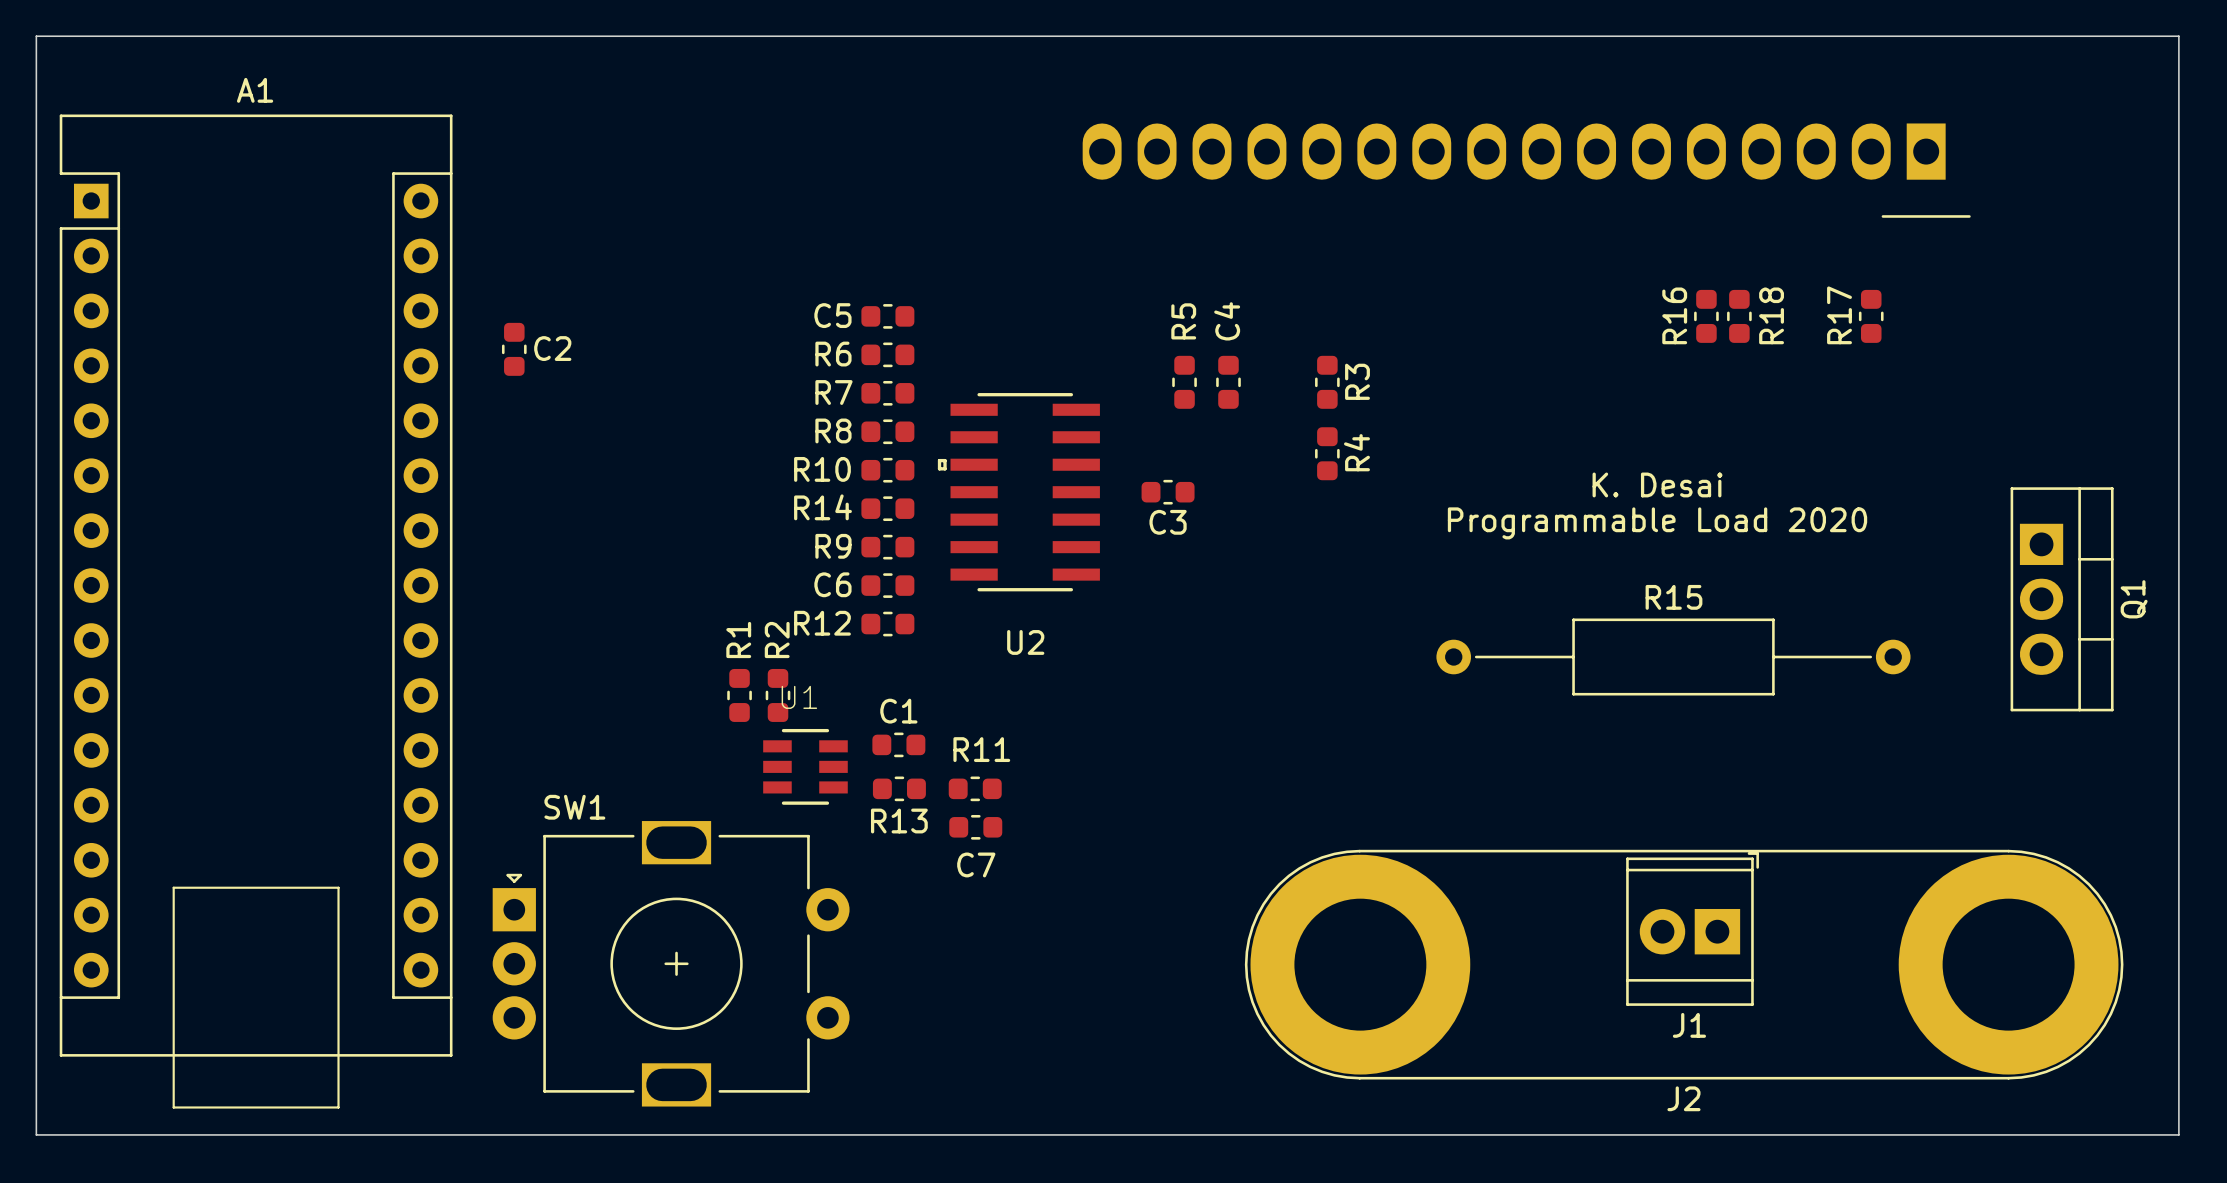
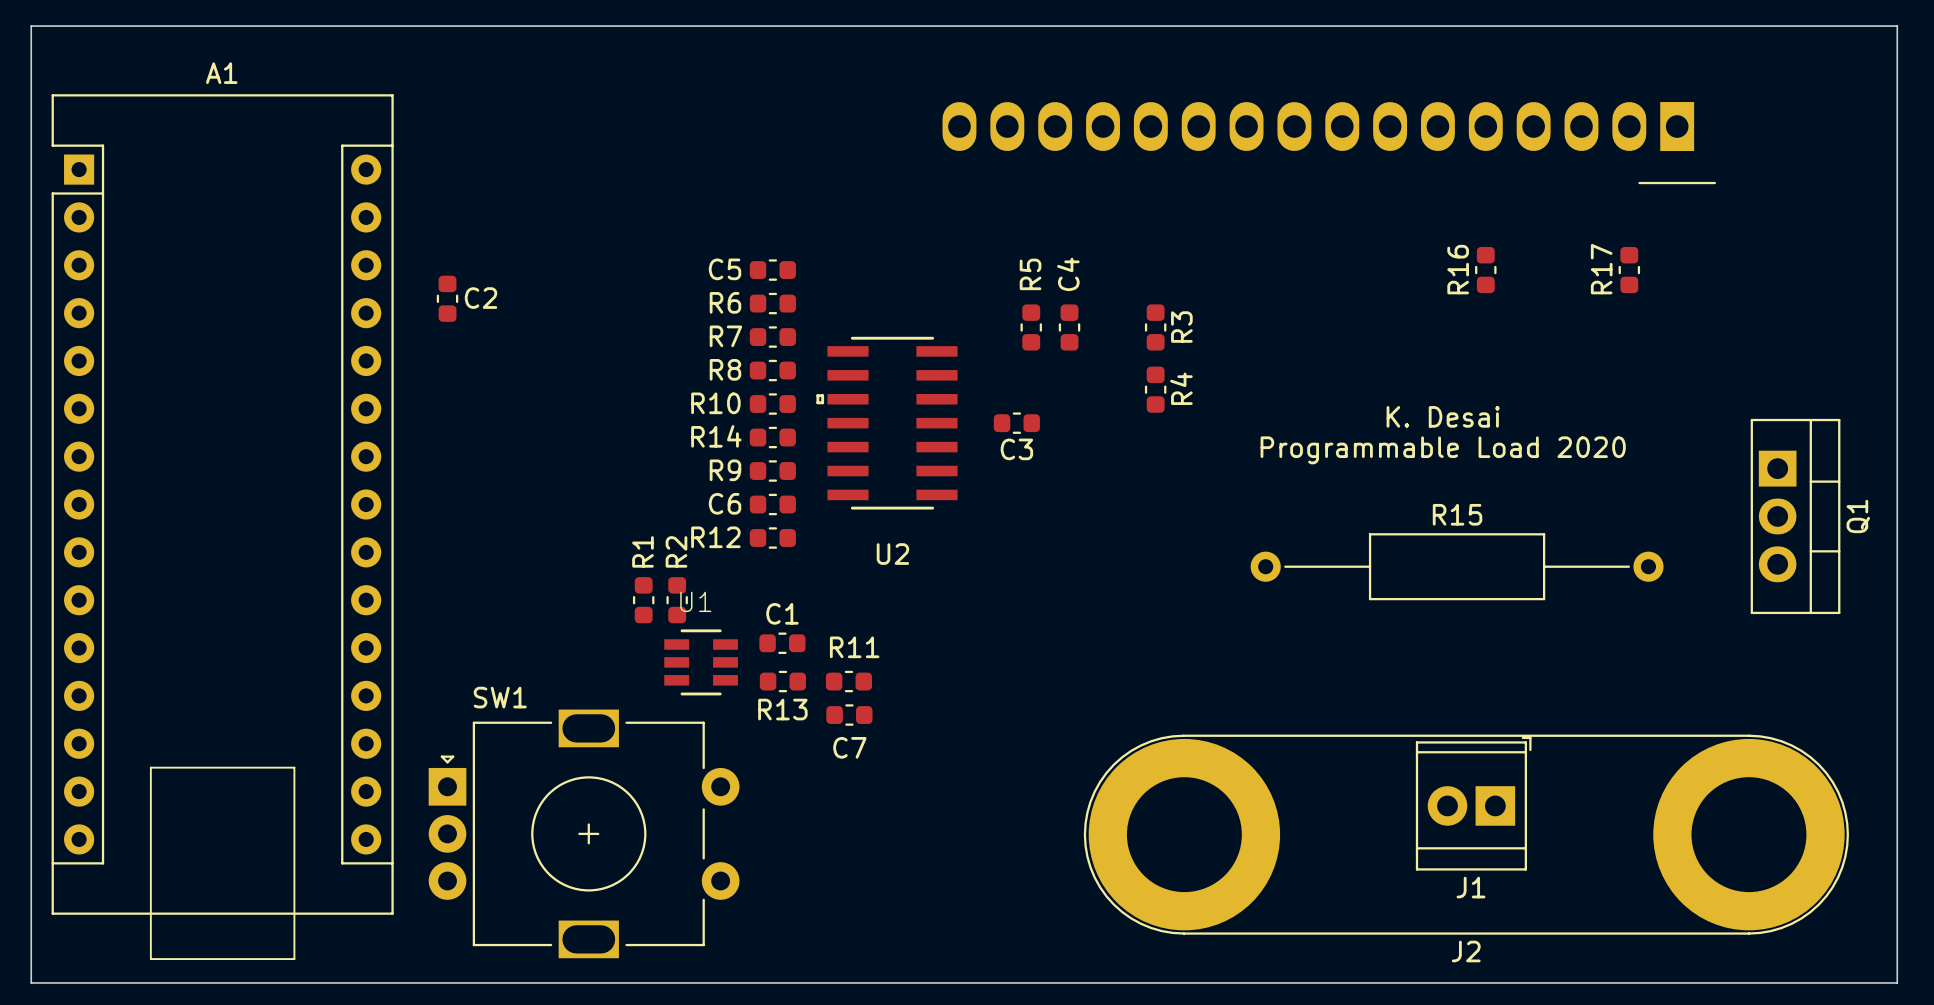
R18: (1739, 316) -> none

